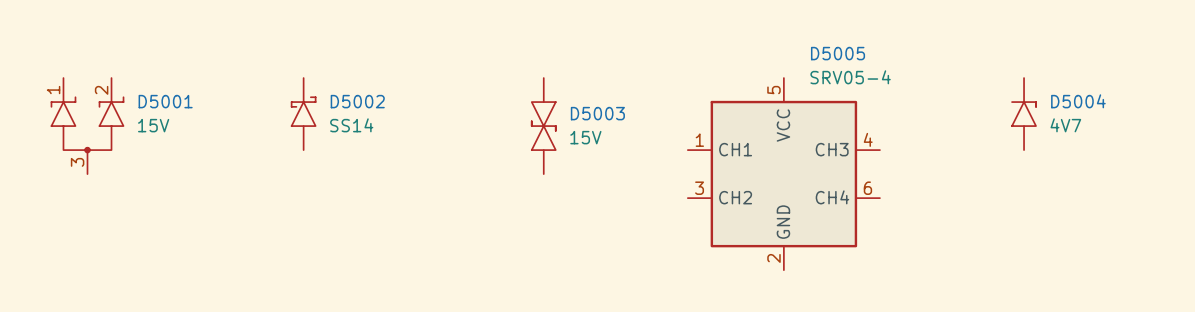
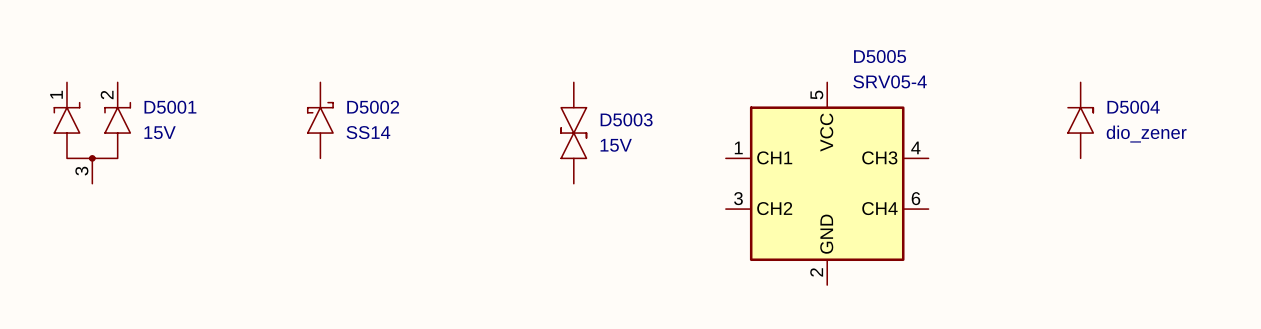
D5004 value: 4V7 (1065, 125) -> dio_zener (1146, 134)

